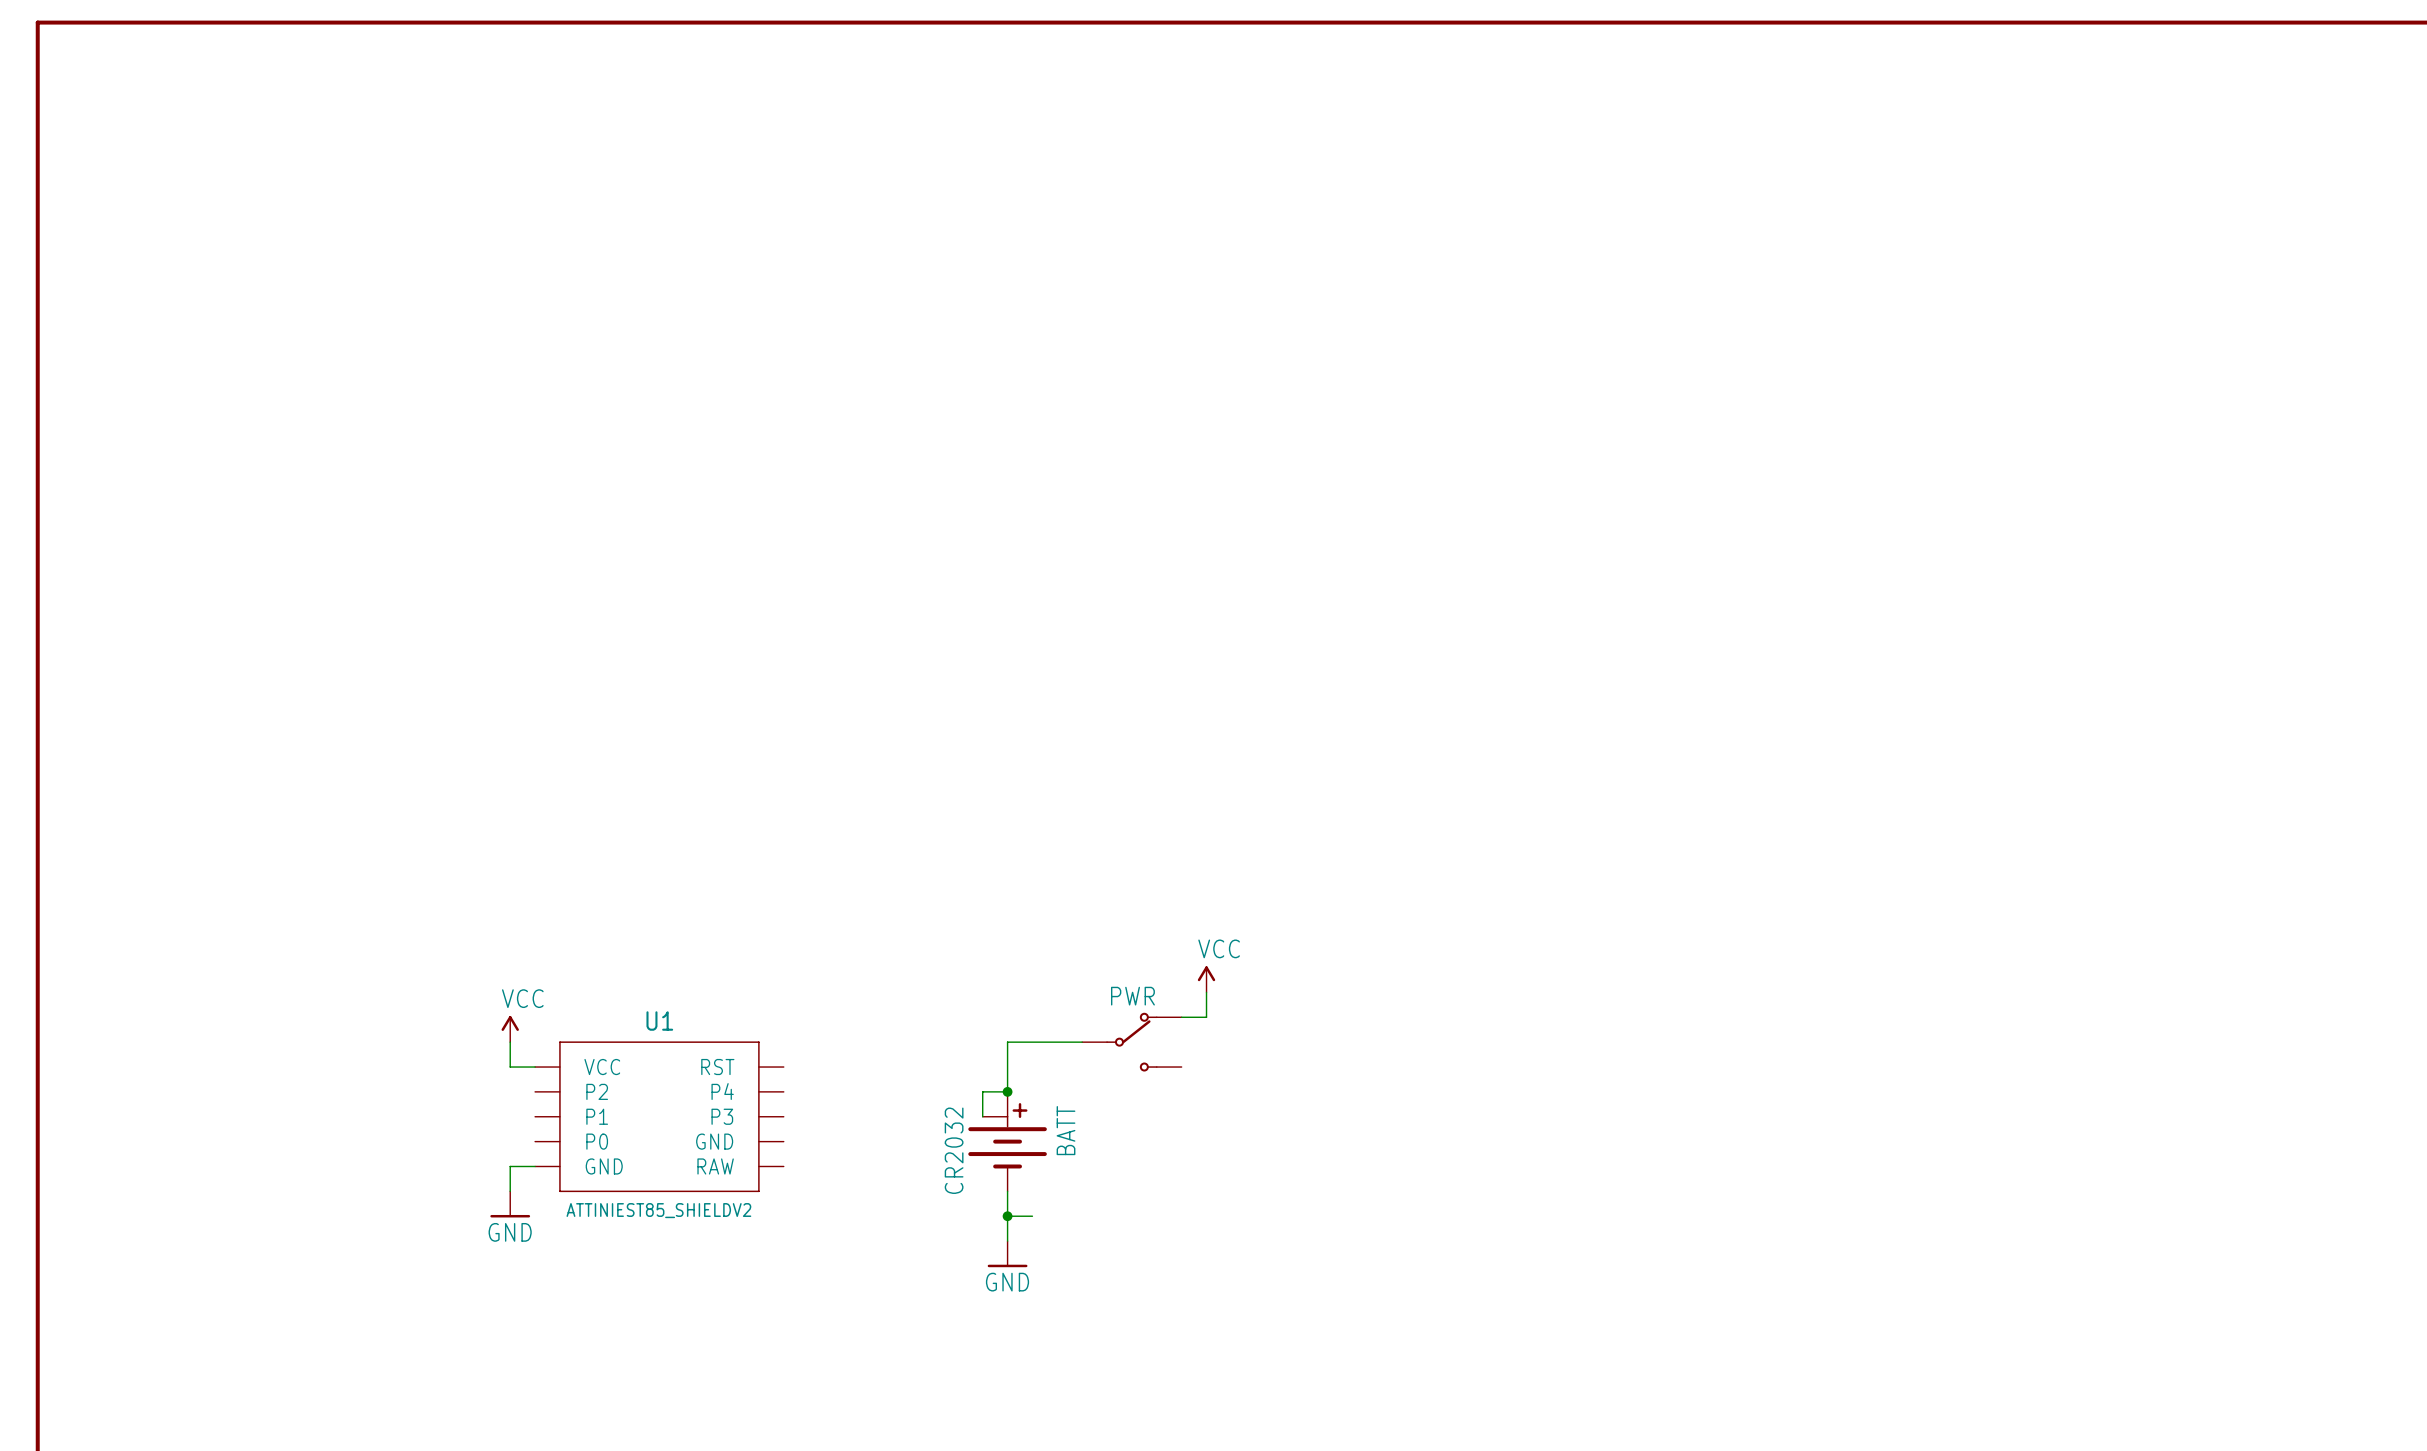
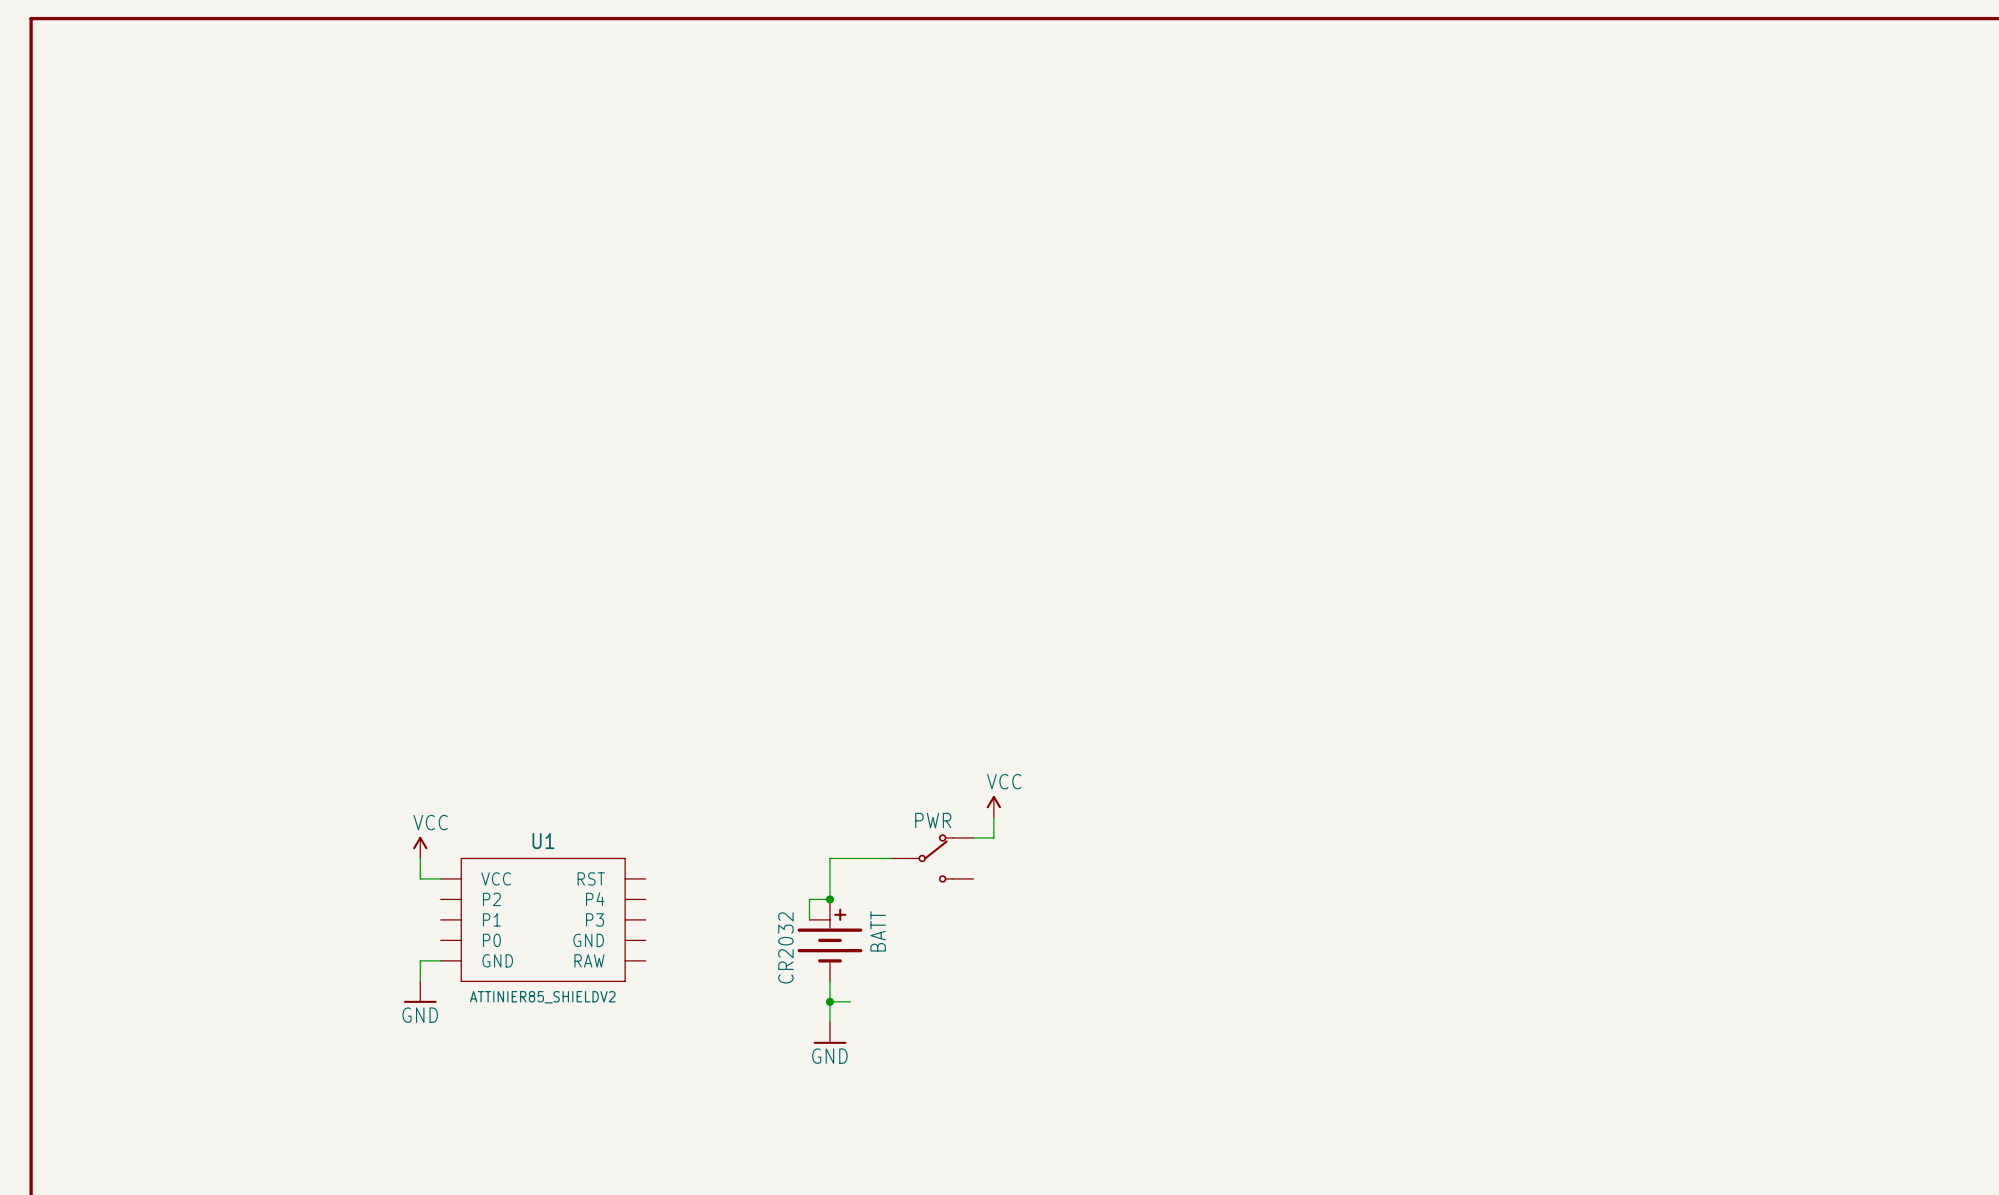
U1 value: ATTINIEST85_SHIELDV2 (658, 1210) -> ATTINIER85_SHIELDV2 (542, 997)

